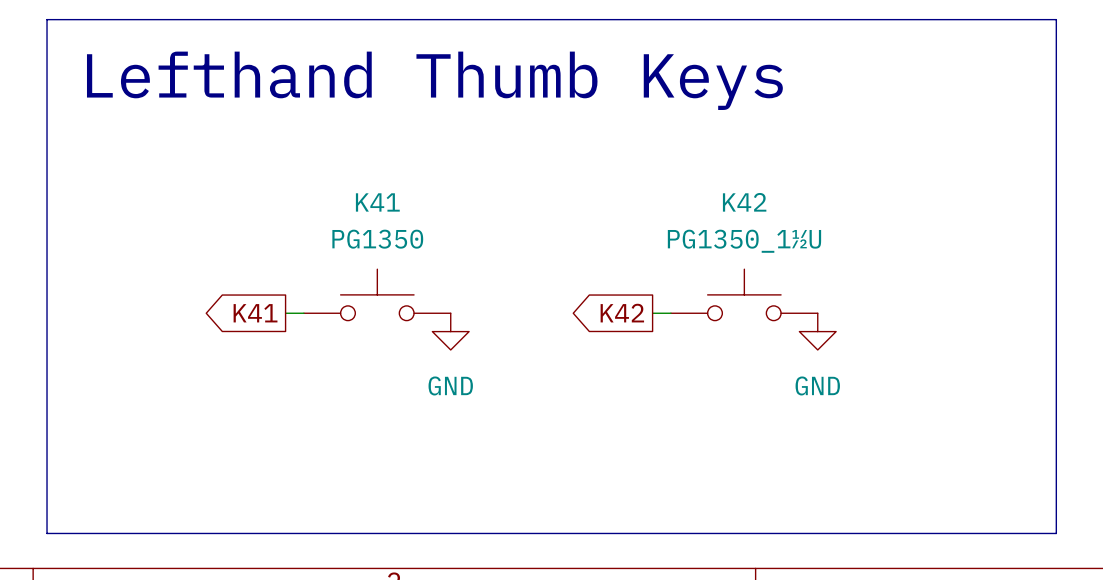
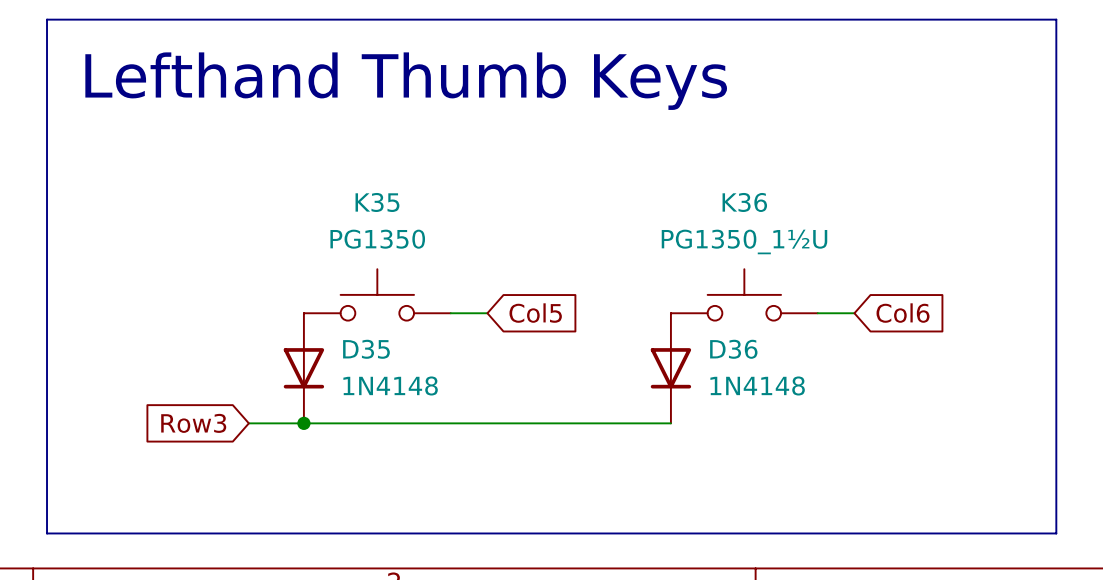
K41 name: K41 (377, 202) -> K35 (377, 202)
K42 name: K42 (744, 202) -> K36 (744, 202)
global label: none -> Col5 (535, 313)
global label: none -> Col6 (903, 313)
global label: K41 (255, 313) -> none
wire: (285, 313) (303, 313) -> none
wire: none -> (450, 313) (487, 313)
global label: K42 (622, 313) -> none
wire: (652, 313) (670, 313) -> none
wire: none -> (817, 313) (854, 313)
power symbol: GND (450, 331) -> none
power symbol: GND (817, 331) -> none
D35: none -> 1N4148 (303, 368)
D36: none -> 1N4148 (670, 368)
global label: none -> Row3 (193, 423)
wire: none -> (248, 423) (670, 423)
junction: none -> (303, 423)

